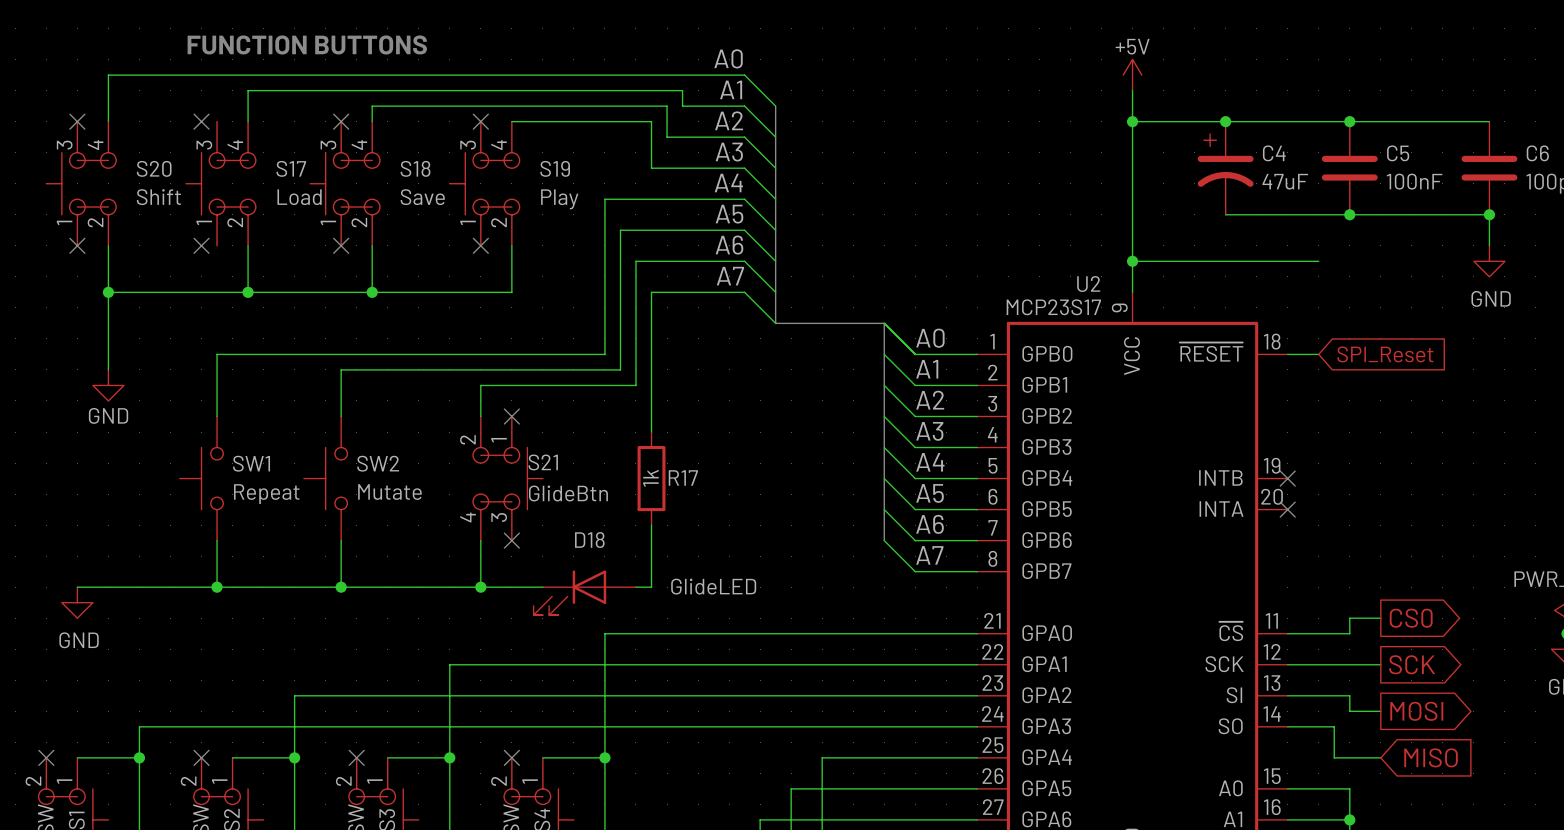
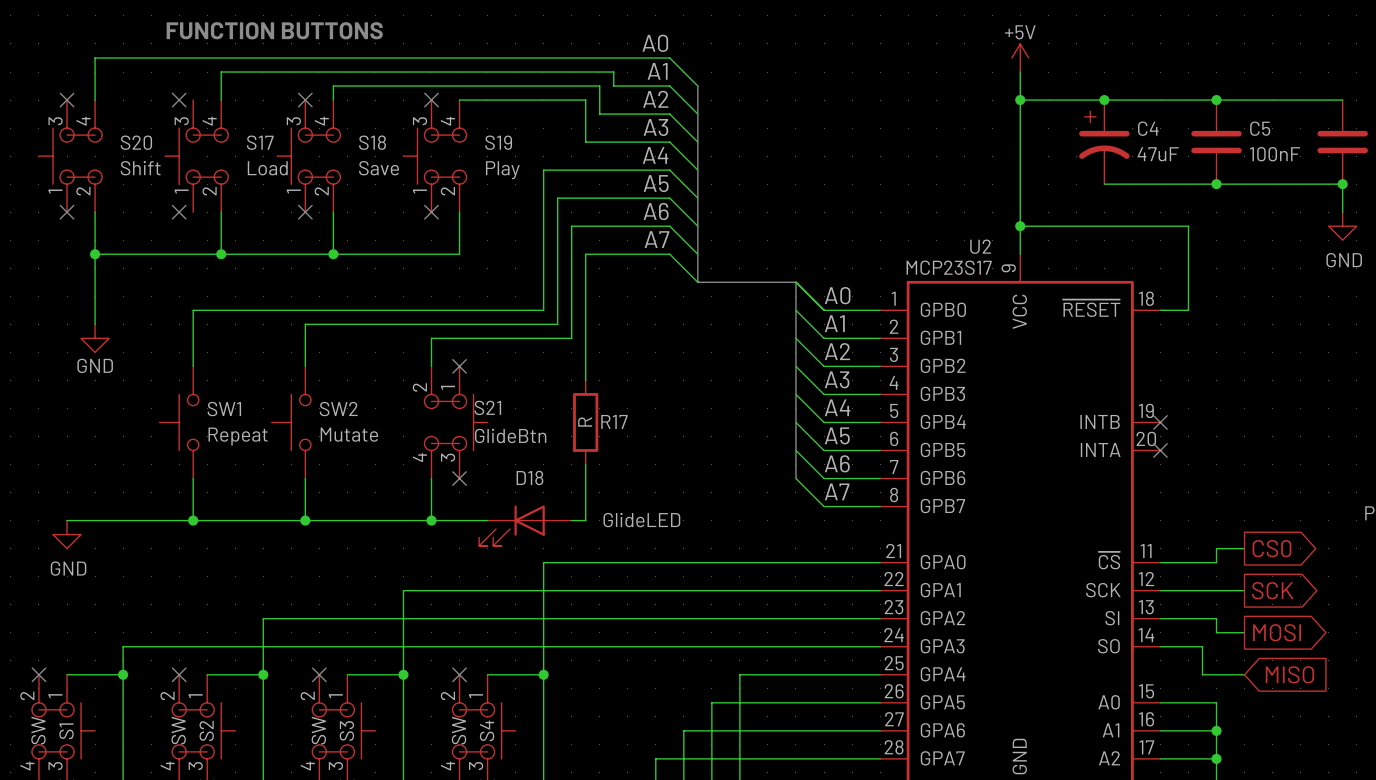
wire: none -> (1188, 226) (1188, 310)
global label: SPI_Reset (1385, 354) -> none
R17 value: 1k (650, 478) -> R (585, 422)

